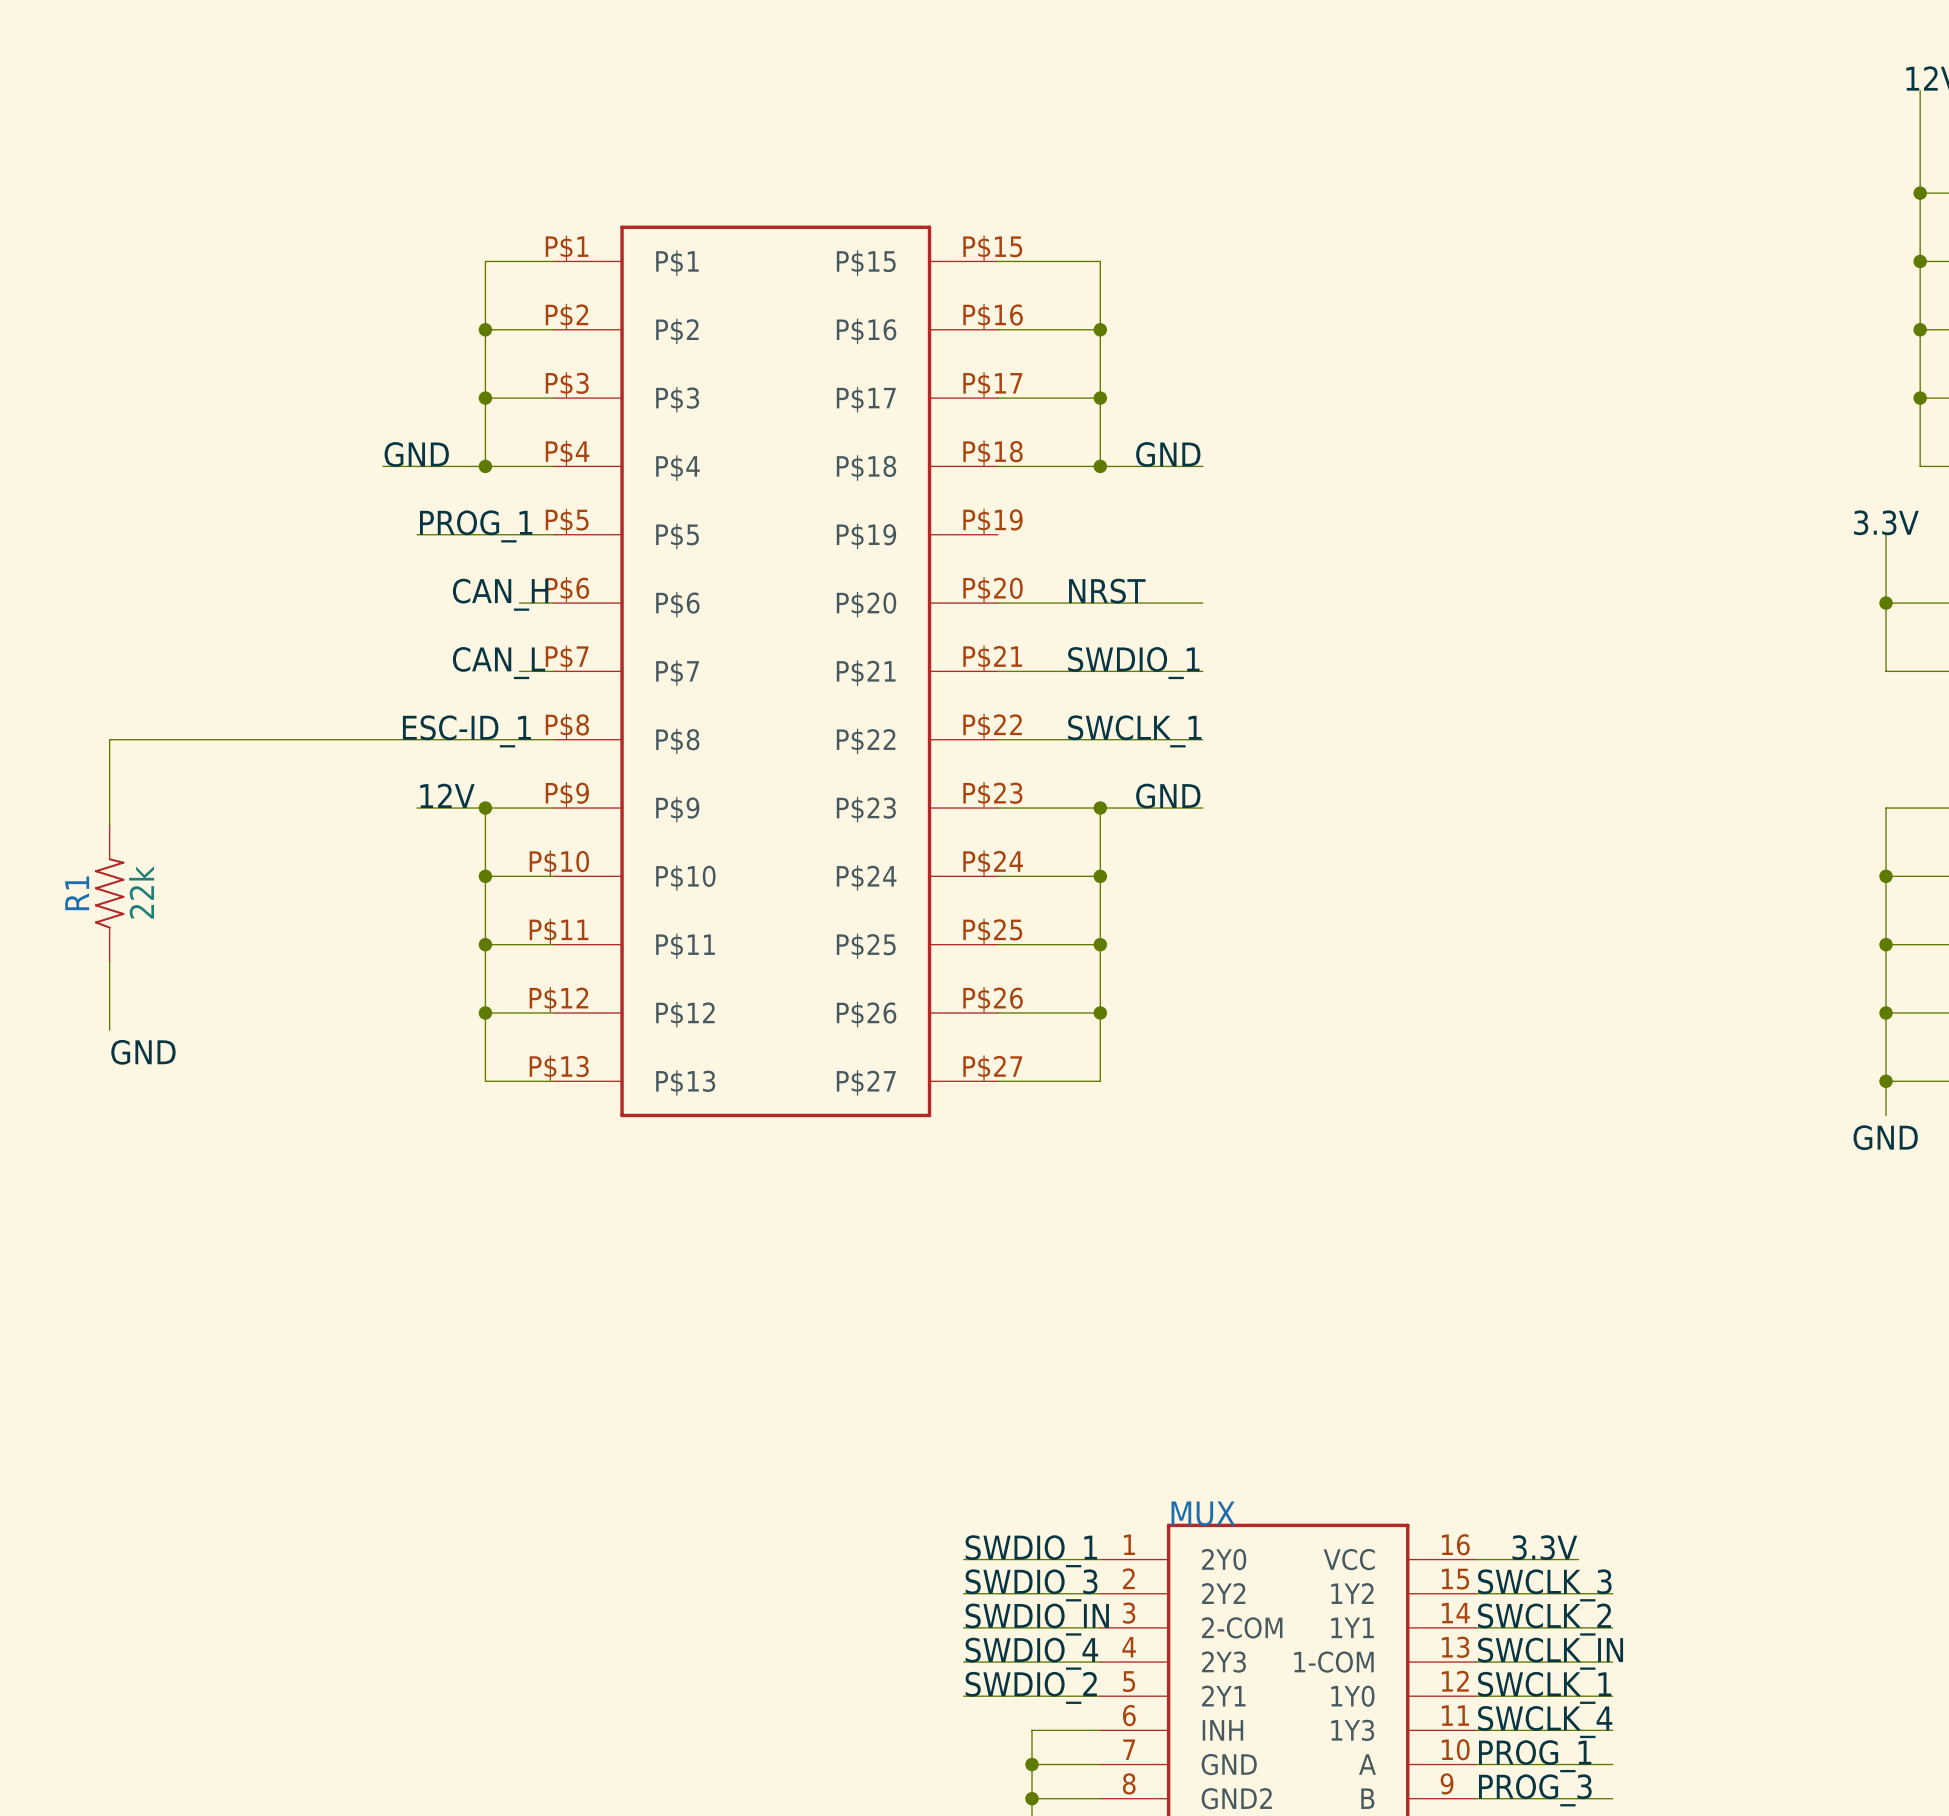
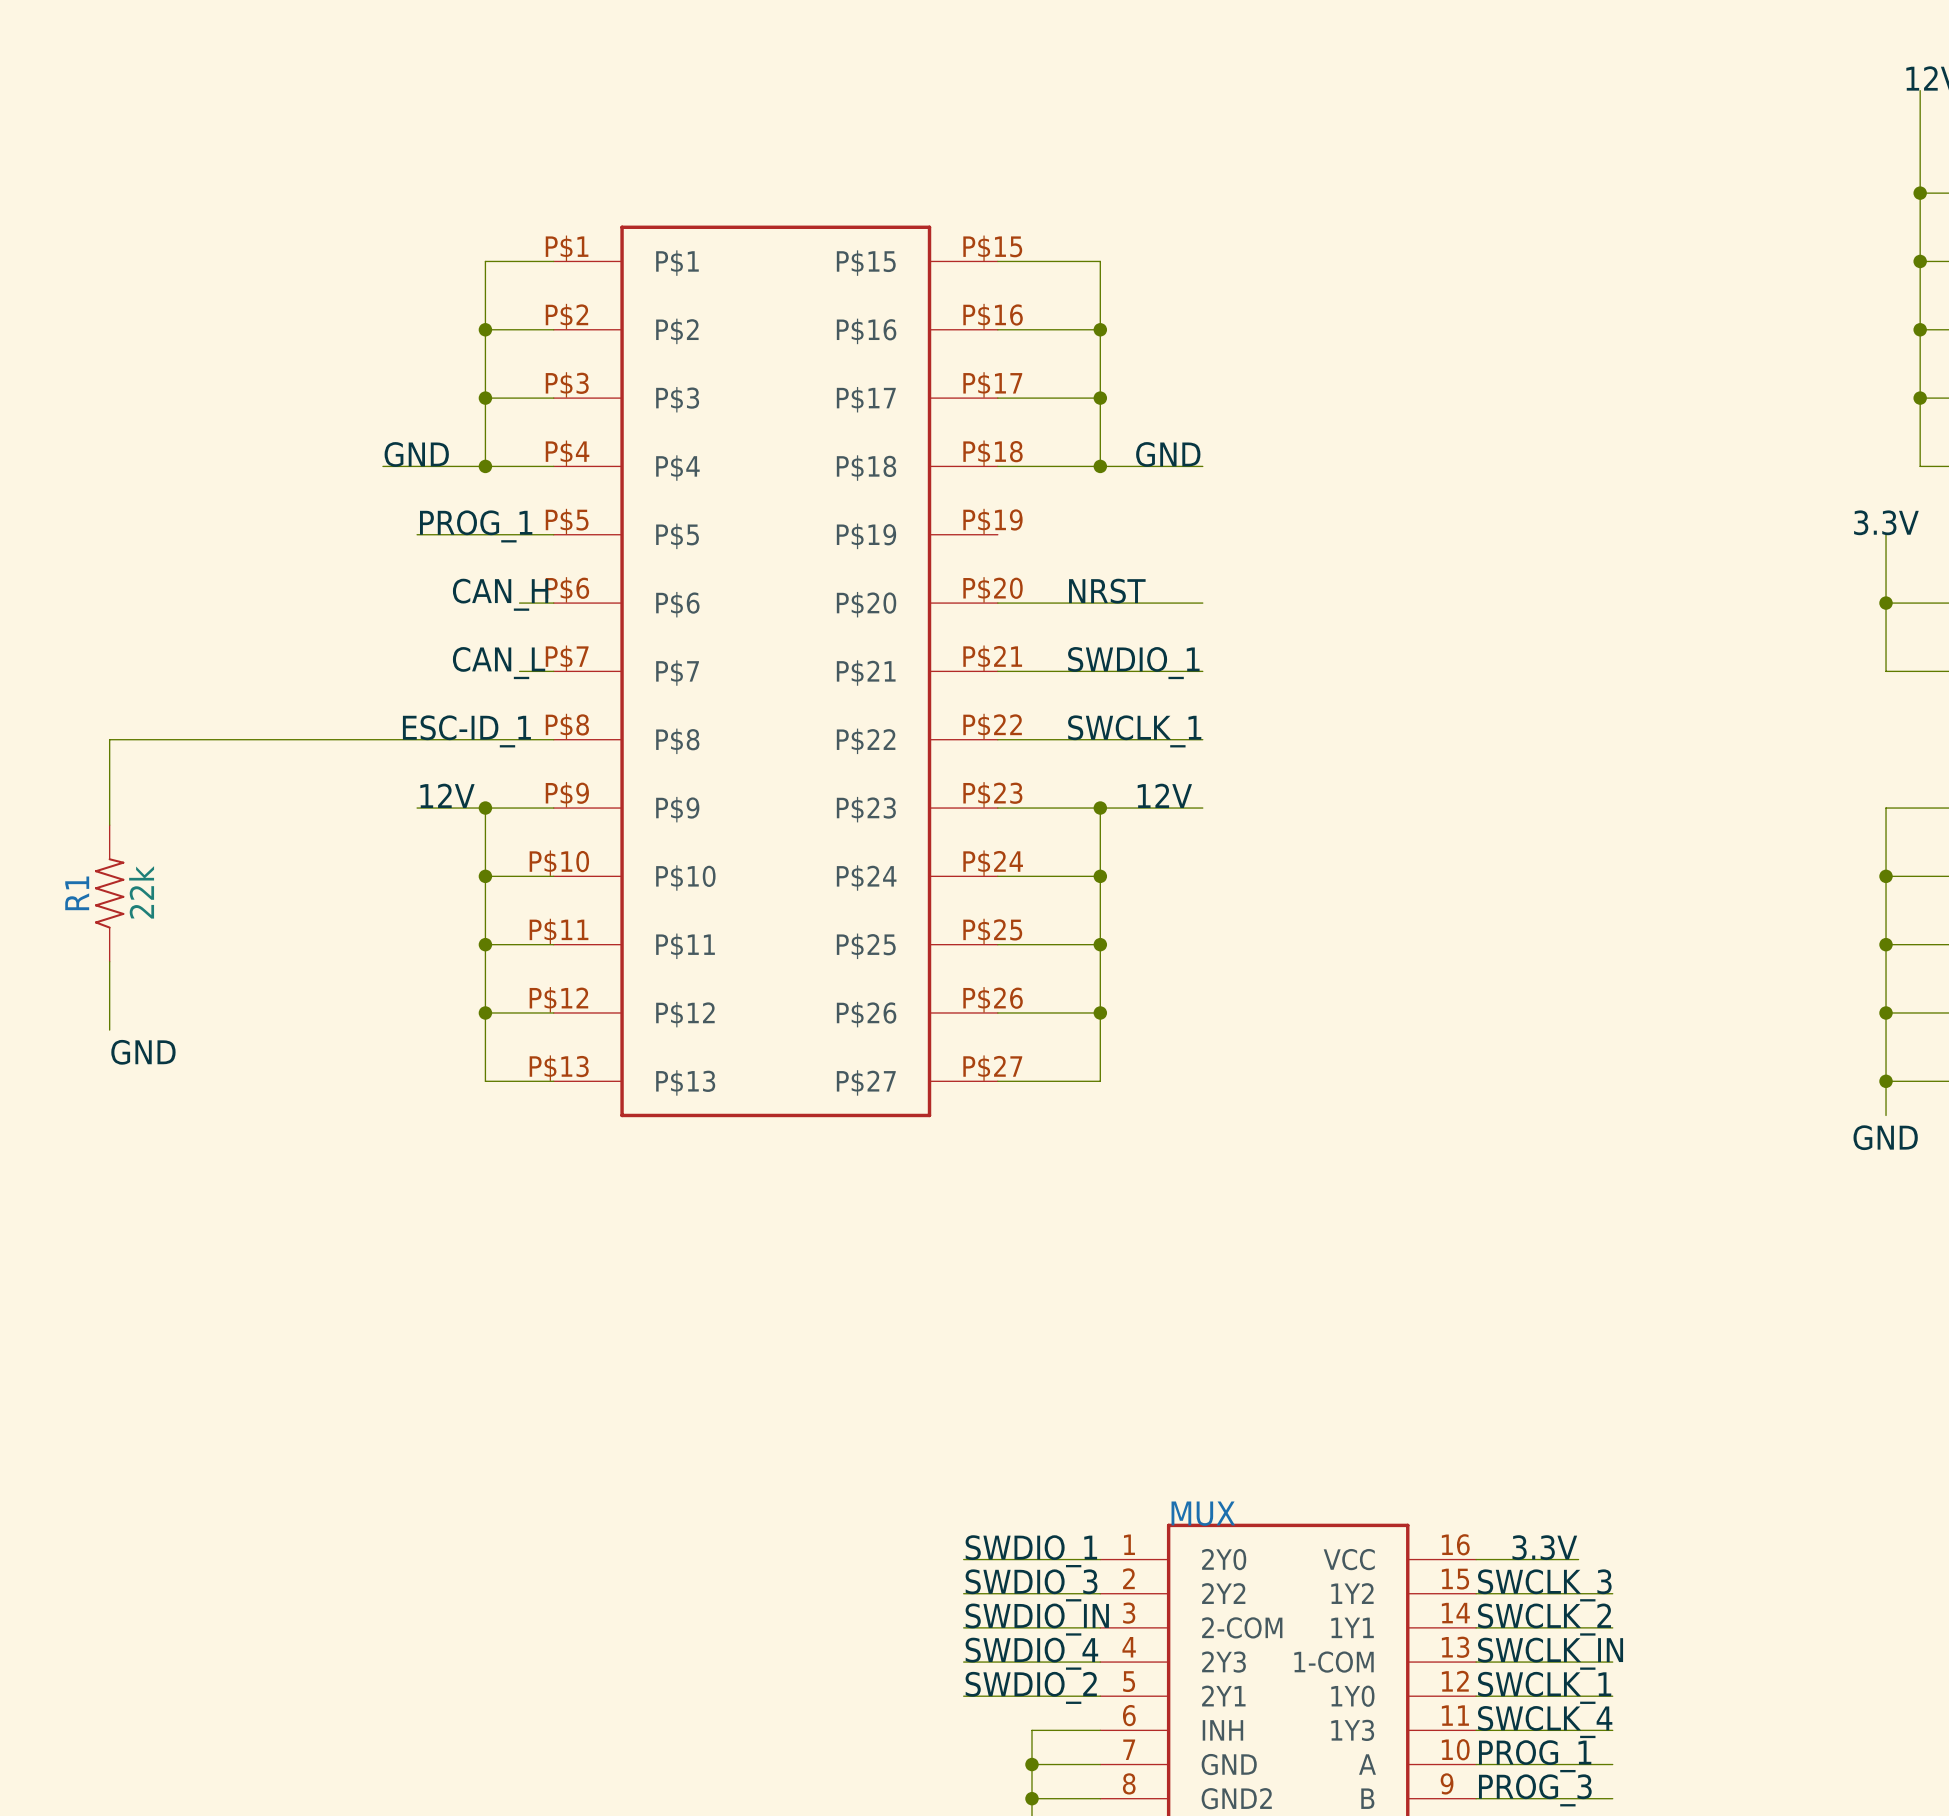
label: GND (1168, 796) -> 12V (1164, 795)

